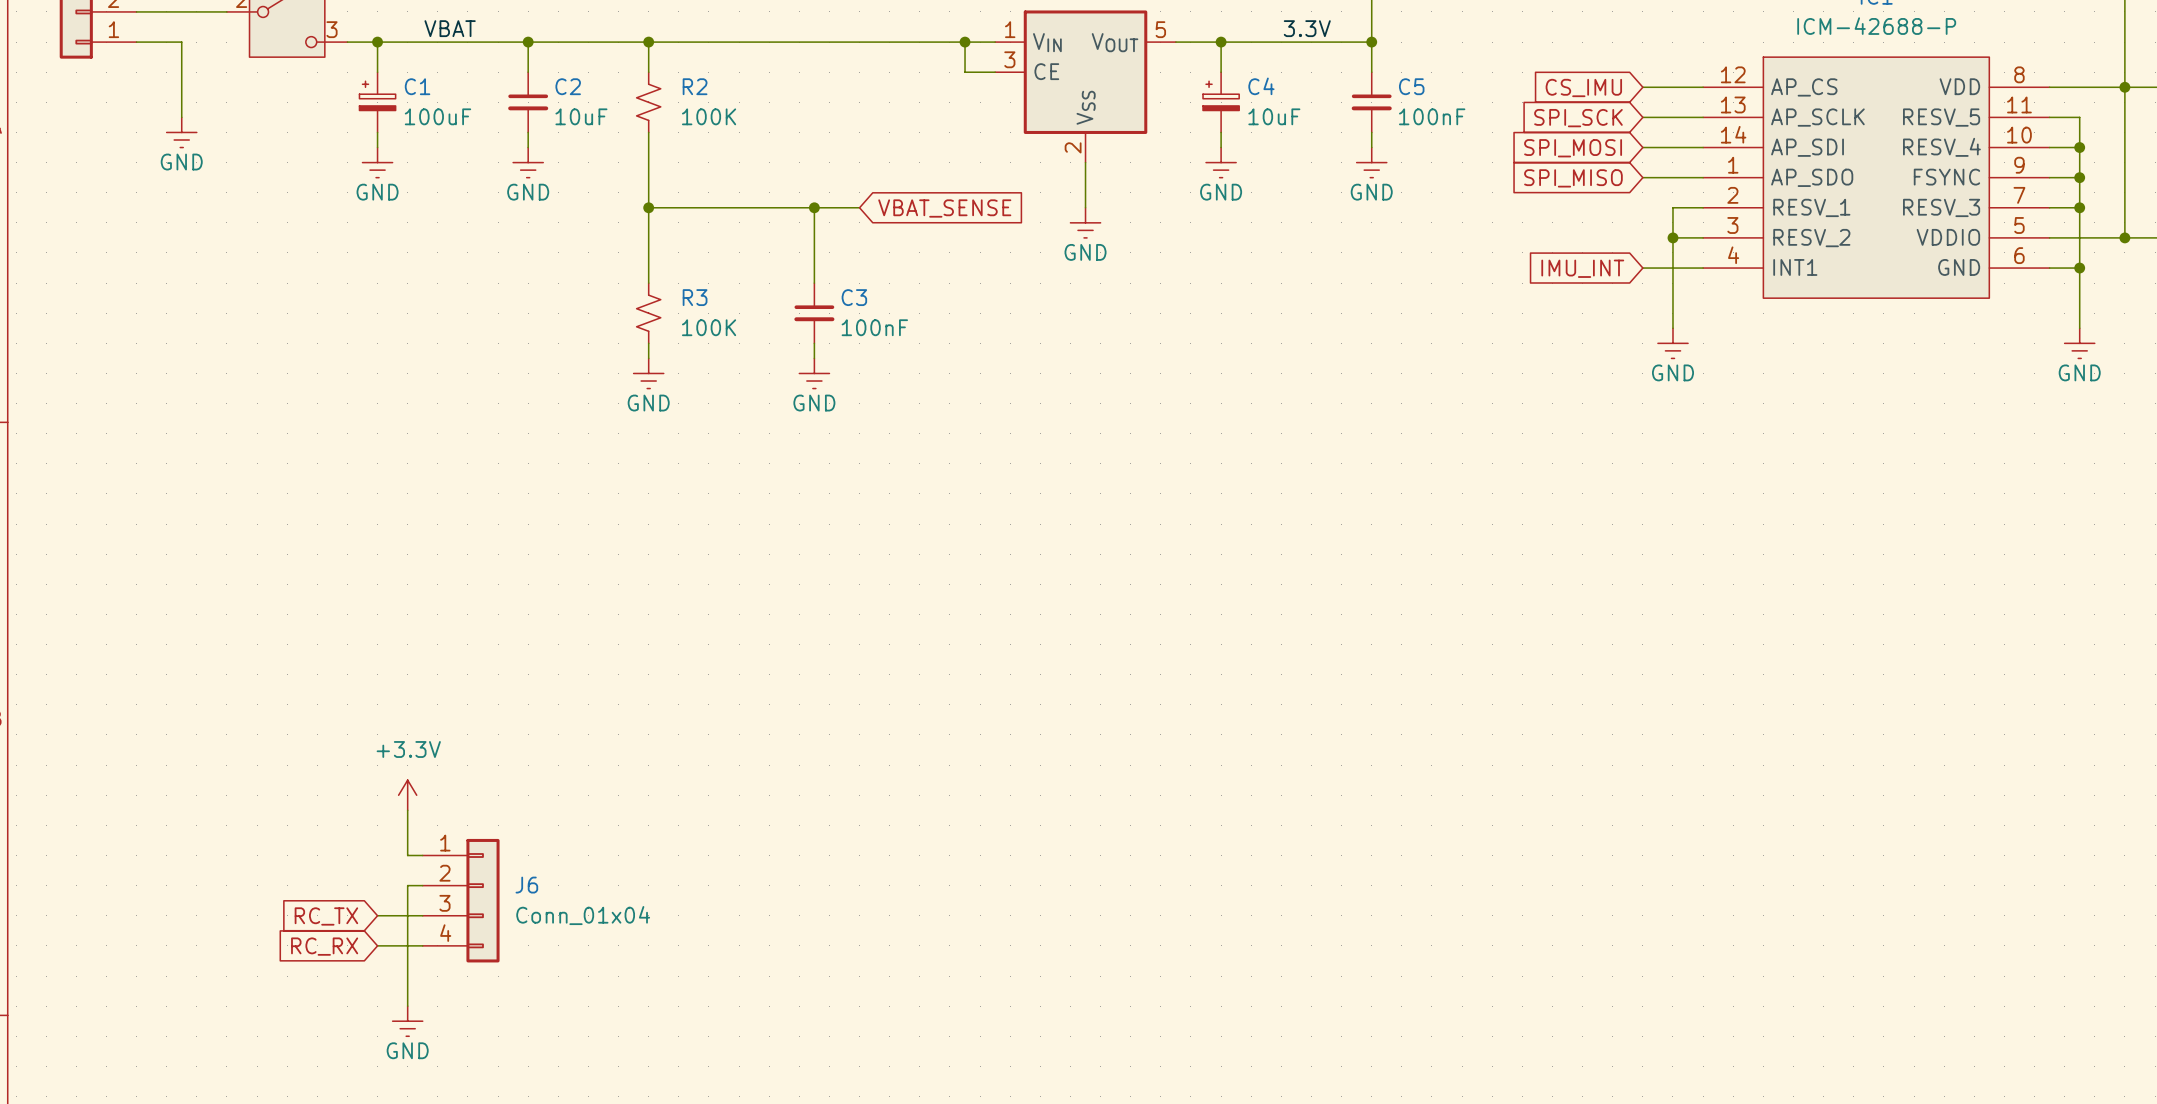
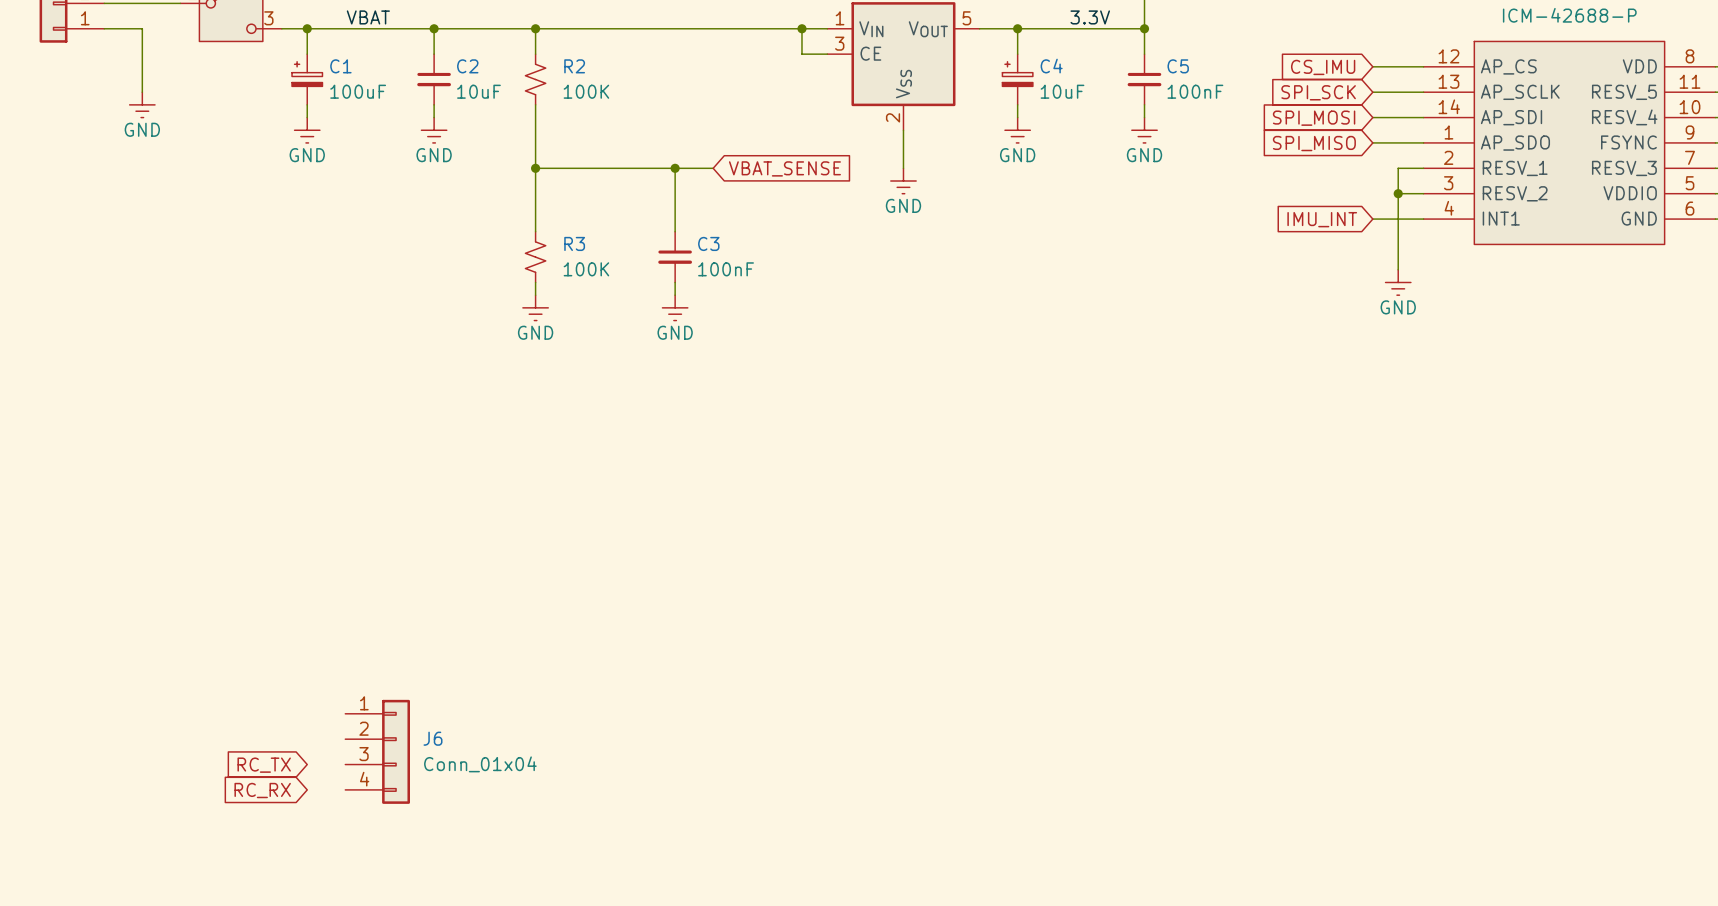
power symbol: +3.3V (407, 795) -> none
wire: (407, 810) (407, 855) (422, 855) -> none
wire: (422, 885) (407, 885) (407, 1006) -> none
wire: (377, 915) (422, 915) -> none
wire: (377, 945) (422, 945) -> none
power symbol: GND (407, 1021) -> none

